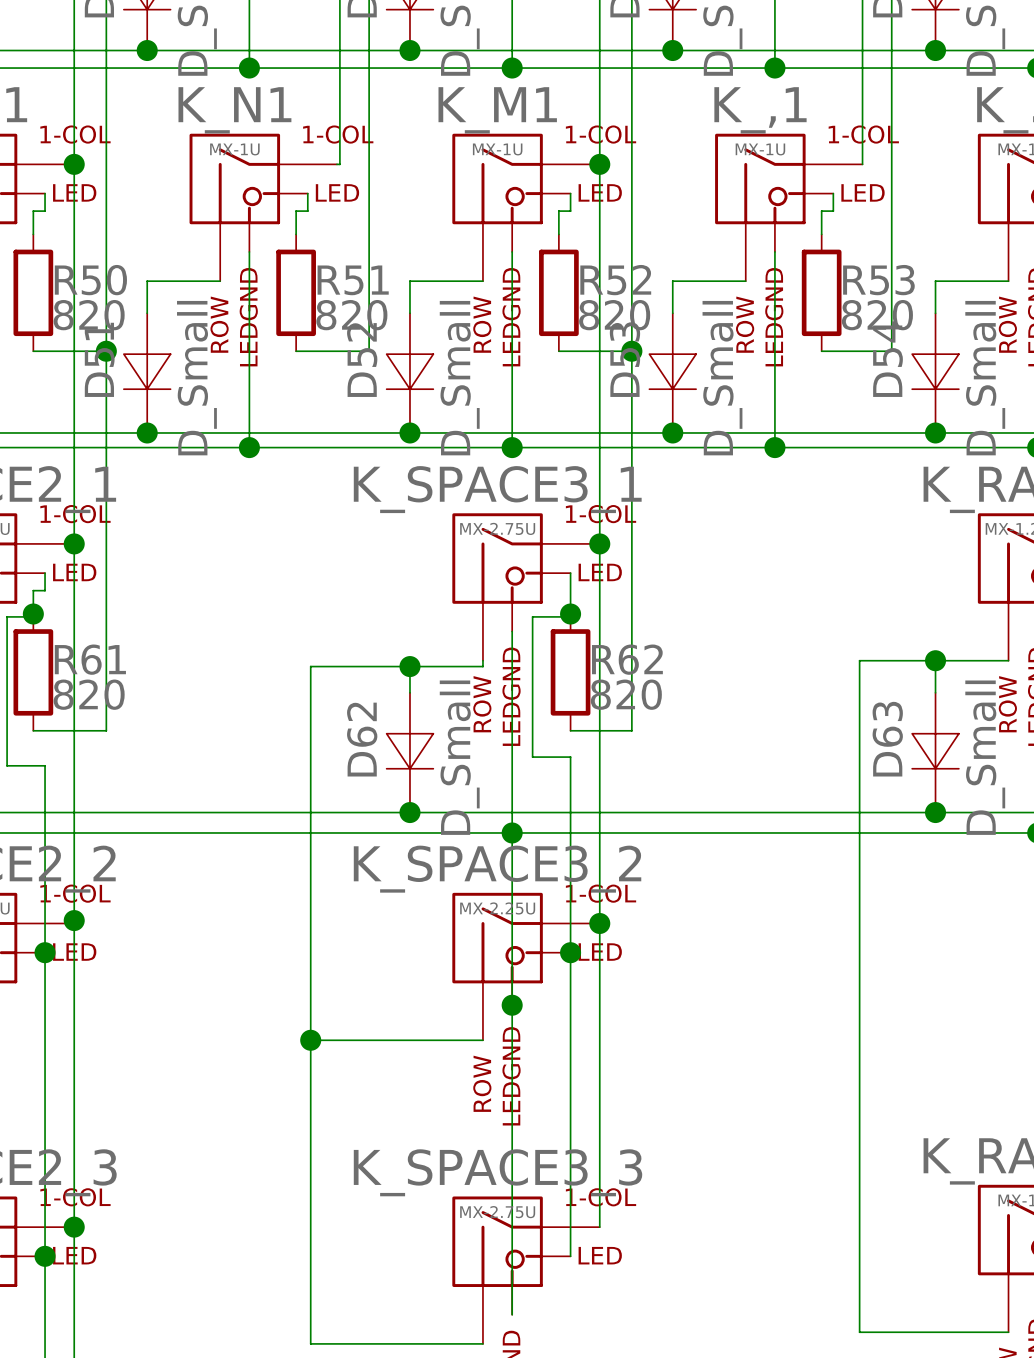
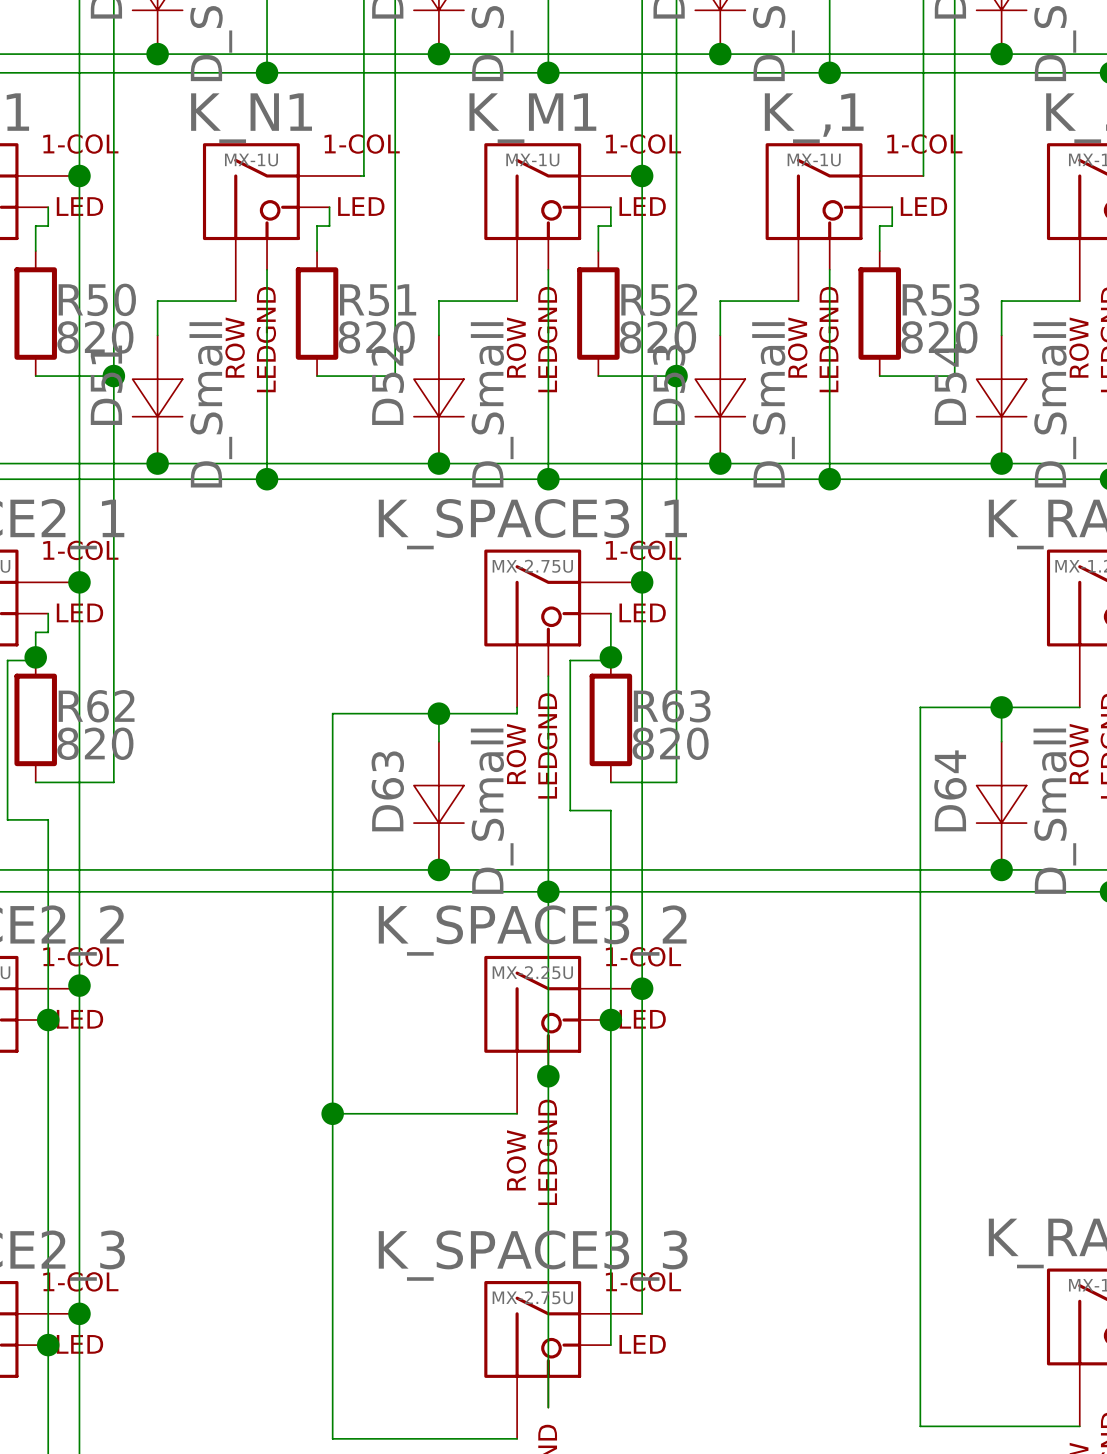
R61 name: R61 (90, 659) -> R62 (96, 706)
R62 name: R62 (627, 659) -> R63 (672, 706)
D62 name: D62 (362, 739) -> D63 (387, 791)
D63 name: D63 (887, 739) -> D64 (950, 790)

